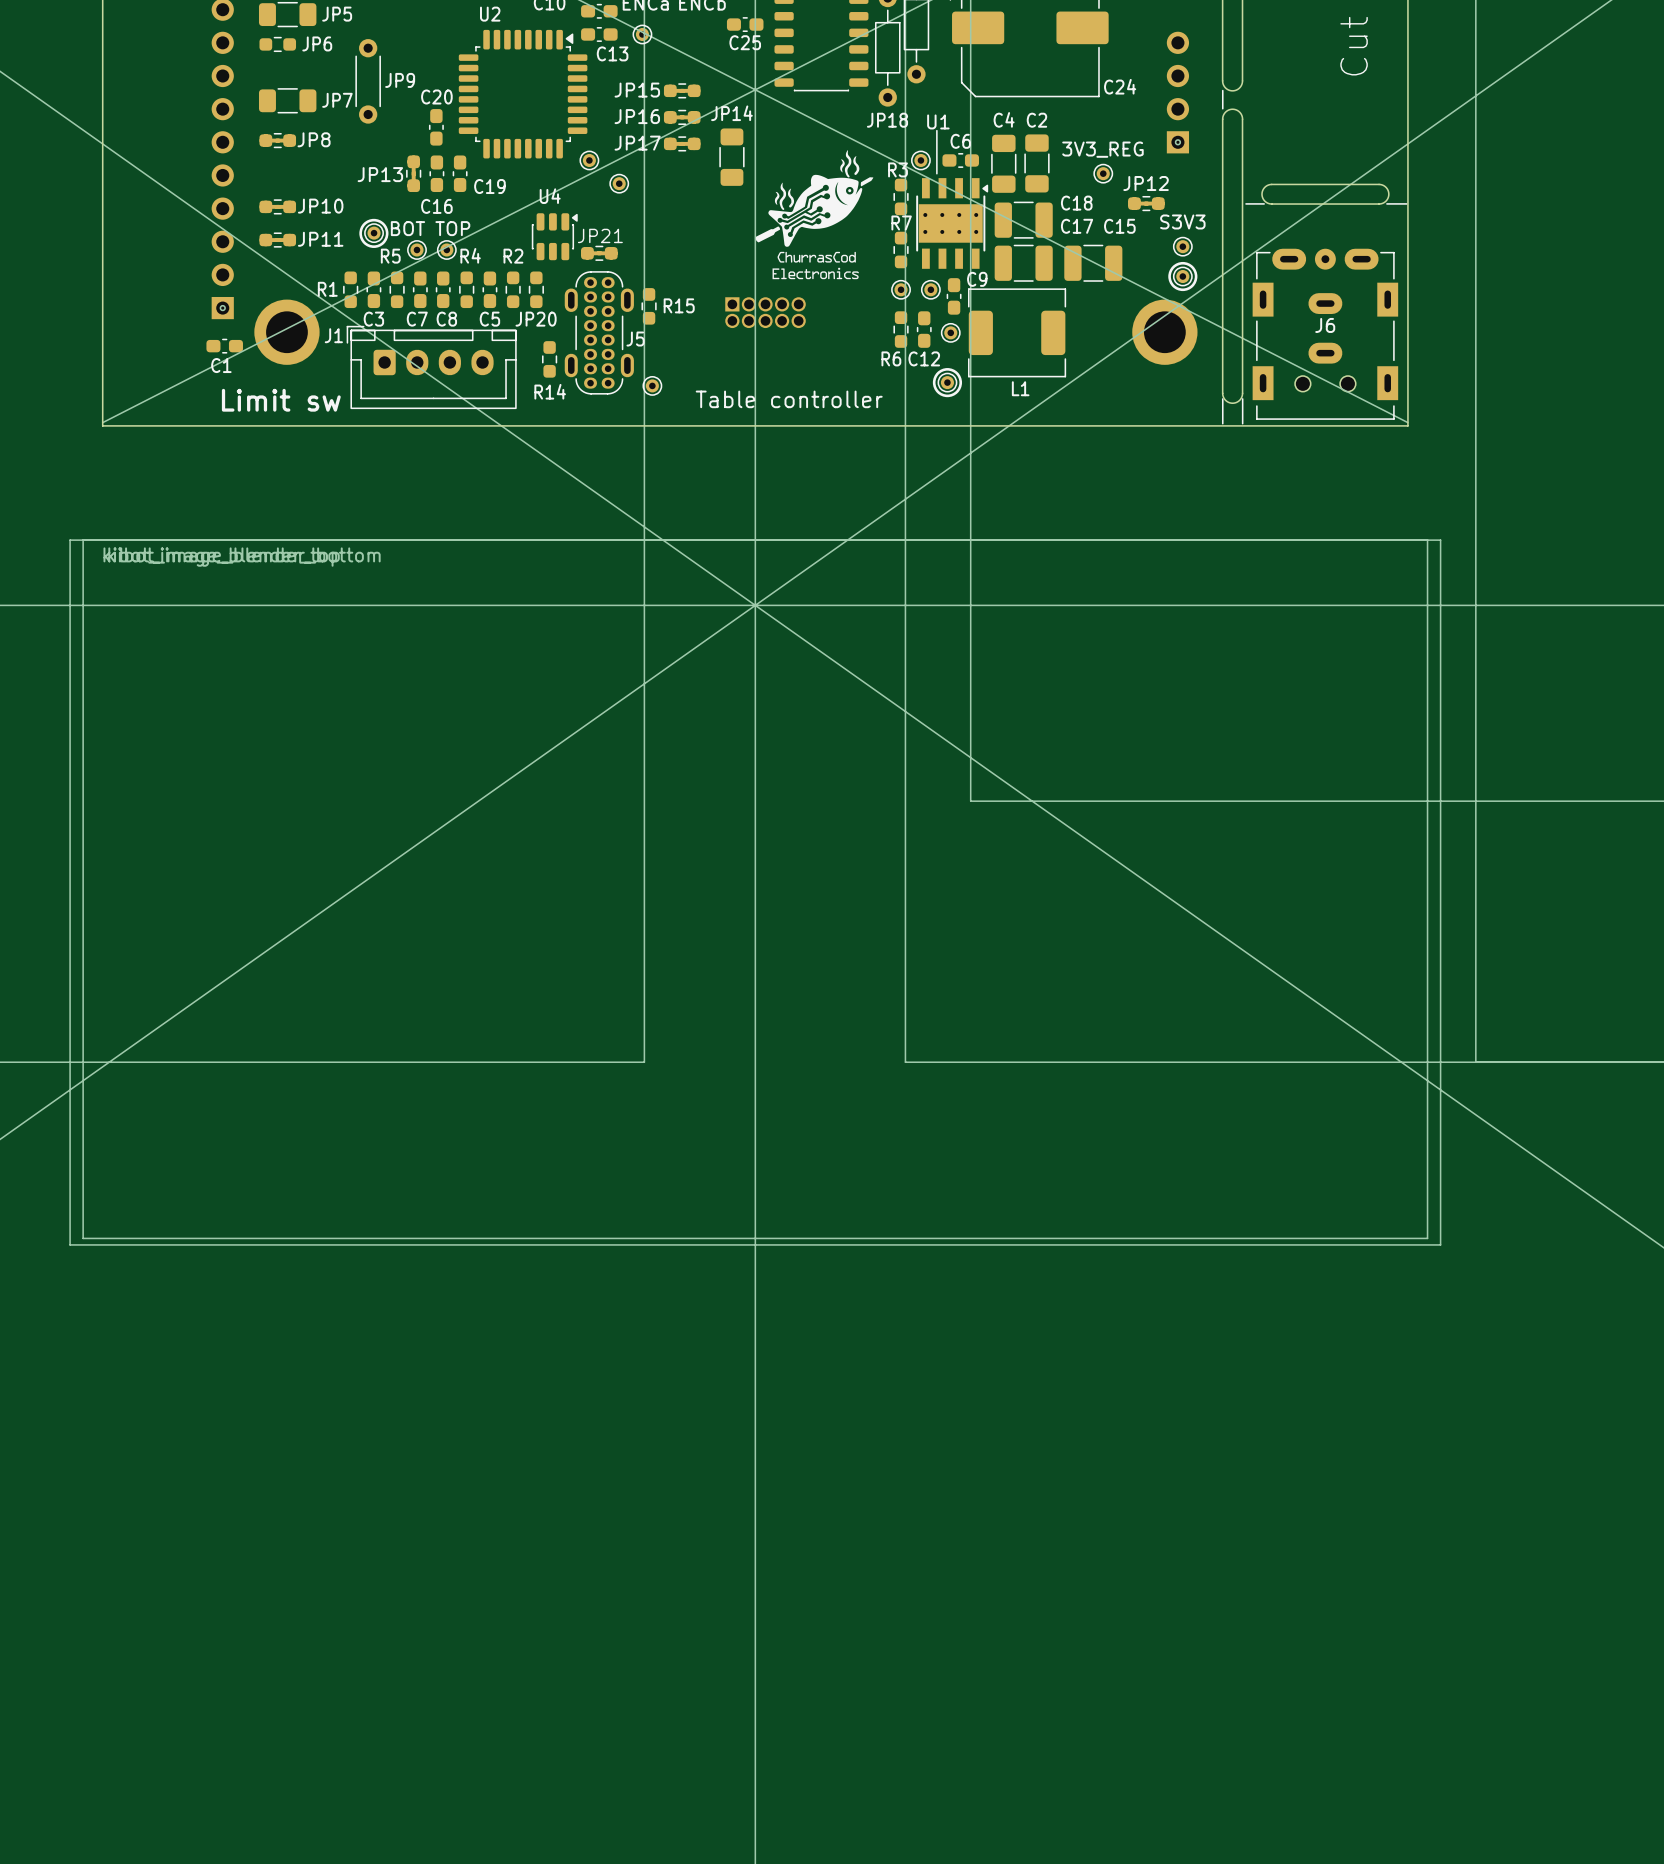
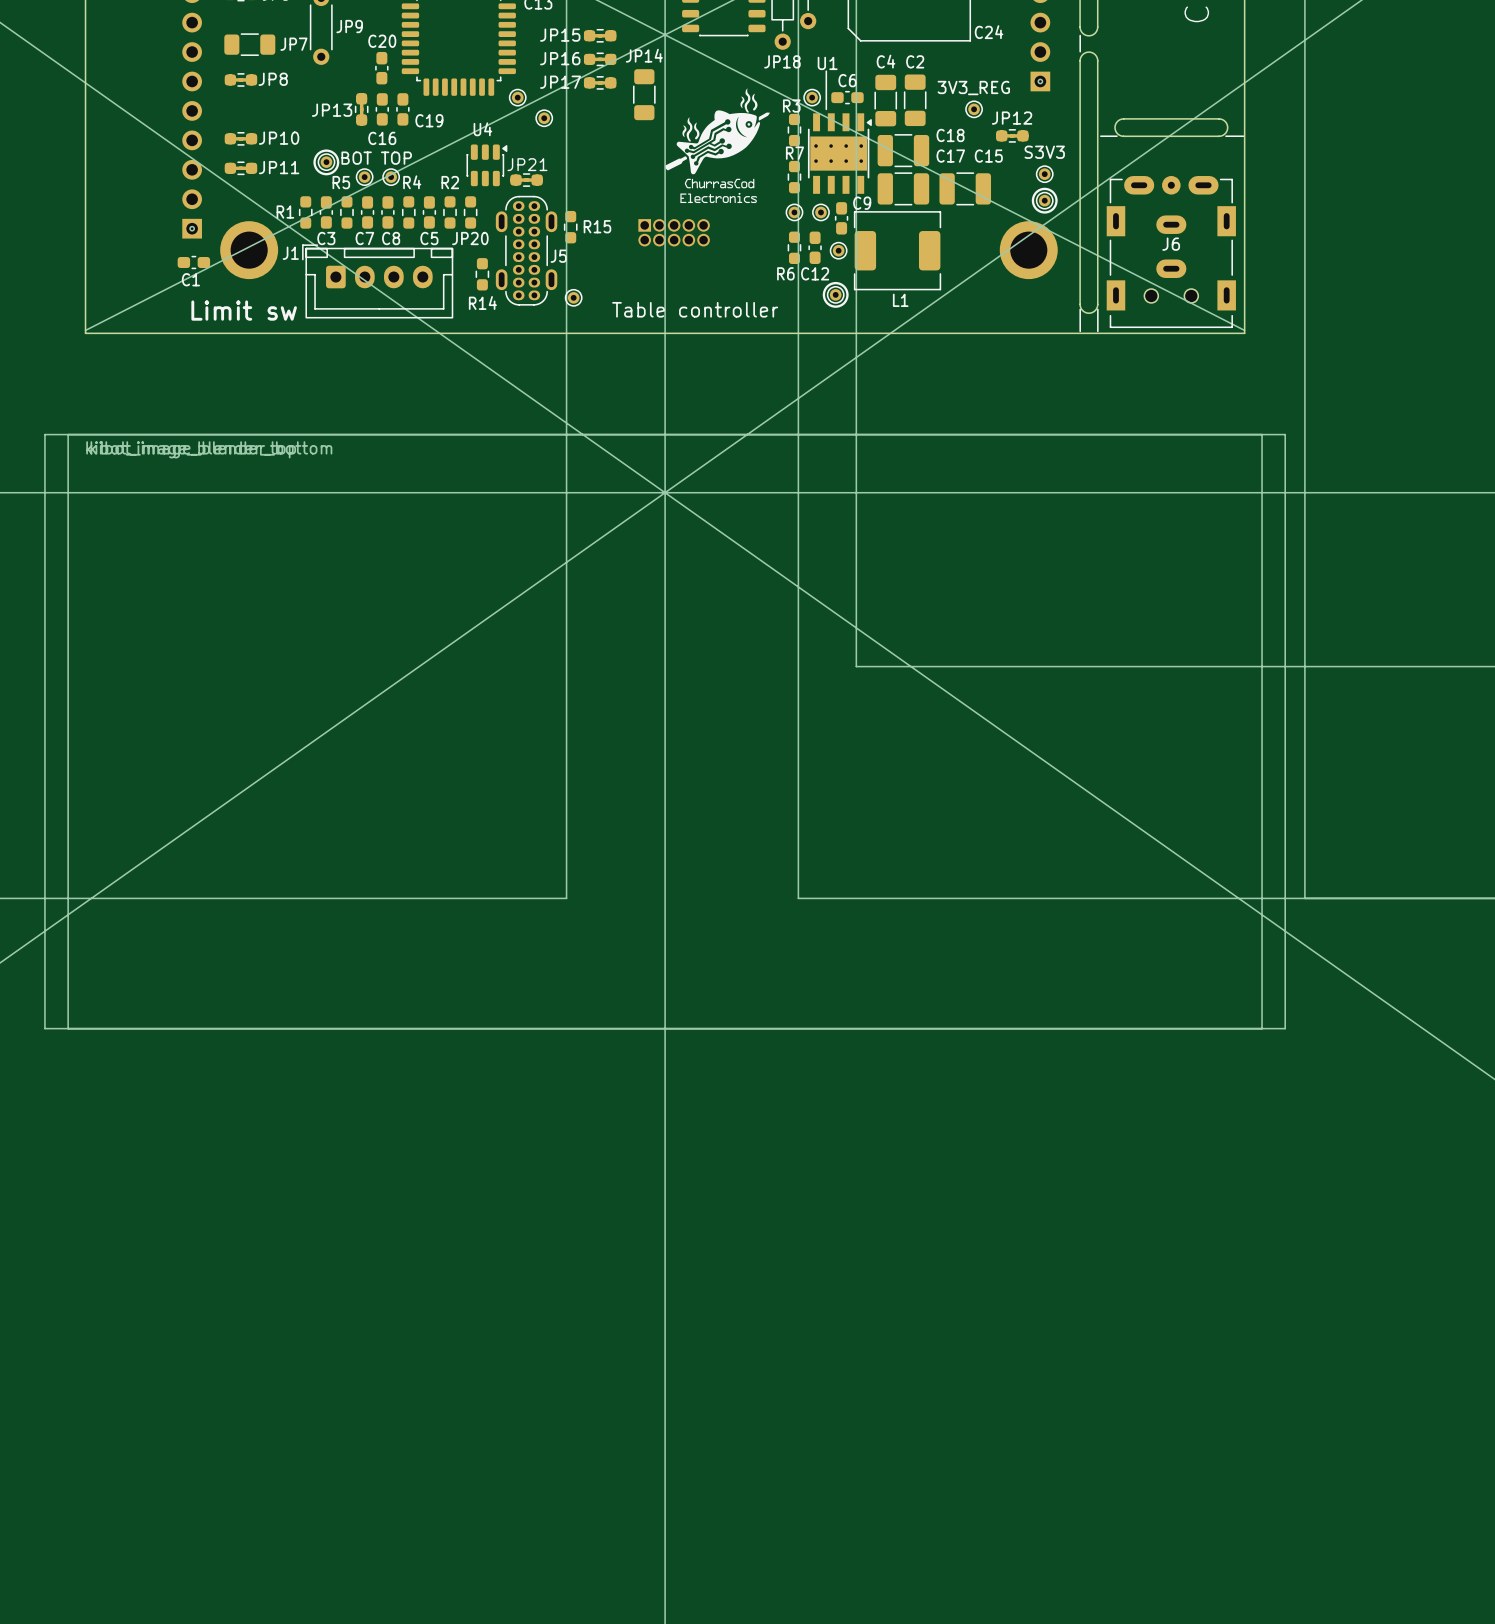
line: (70, 540) (1440, 540) (1440, 1244) (70, 1244) (70, 540) -> (44, 434) (44, 1028) (1285, 1028) (1285, 434) (44, 434)
line: (83, 1208) (83, 1238) (1427, 1238) (1427, 1208) -> none

